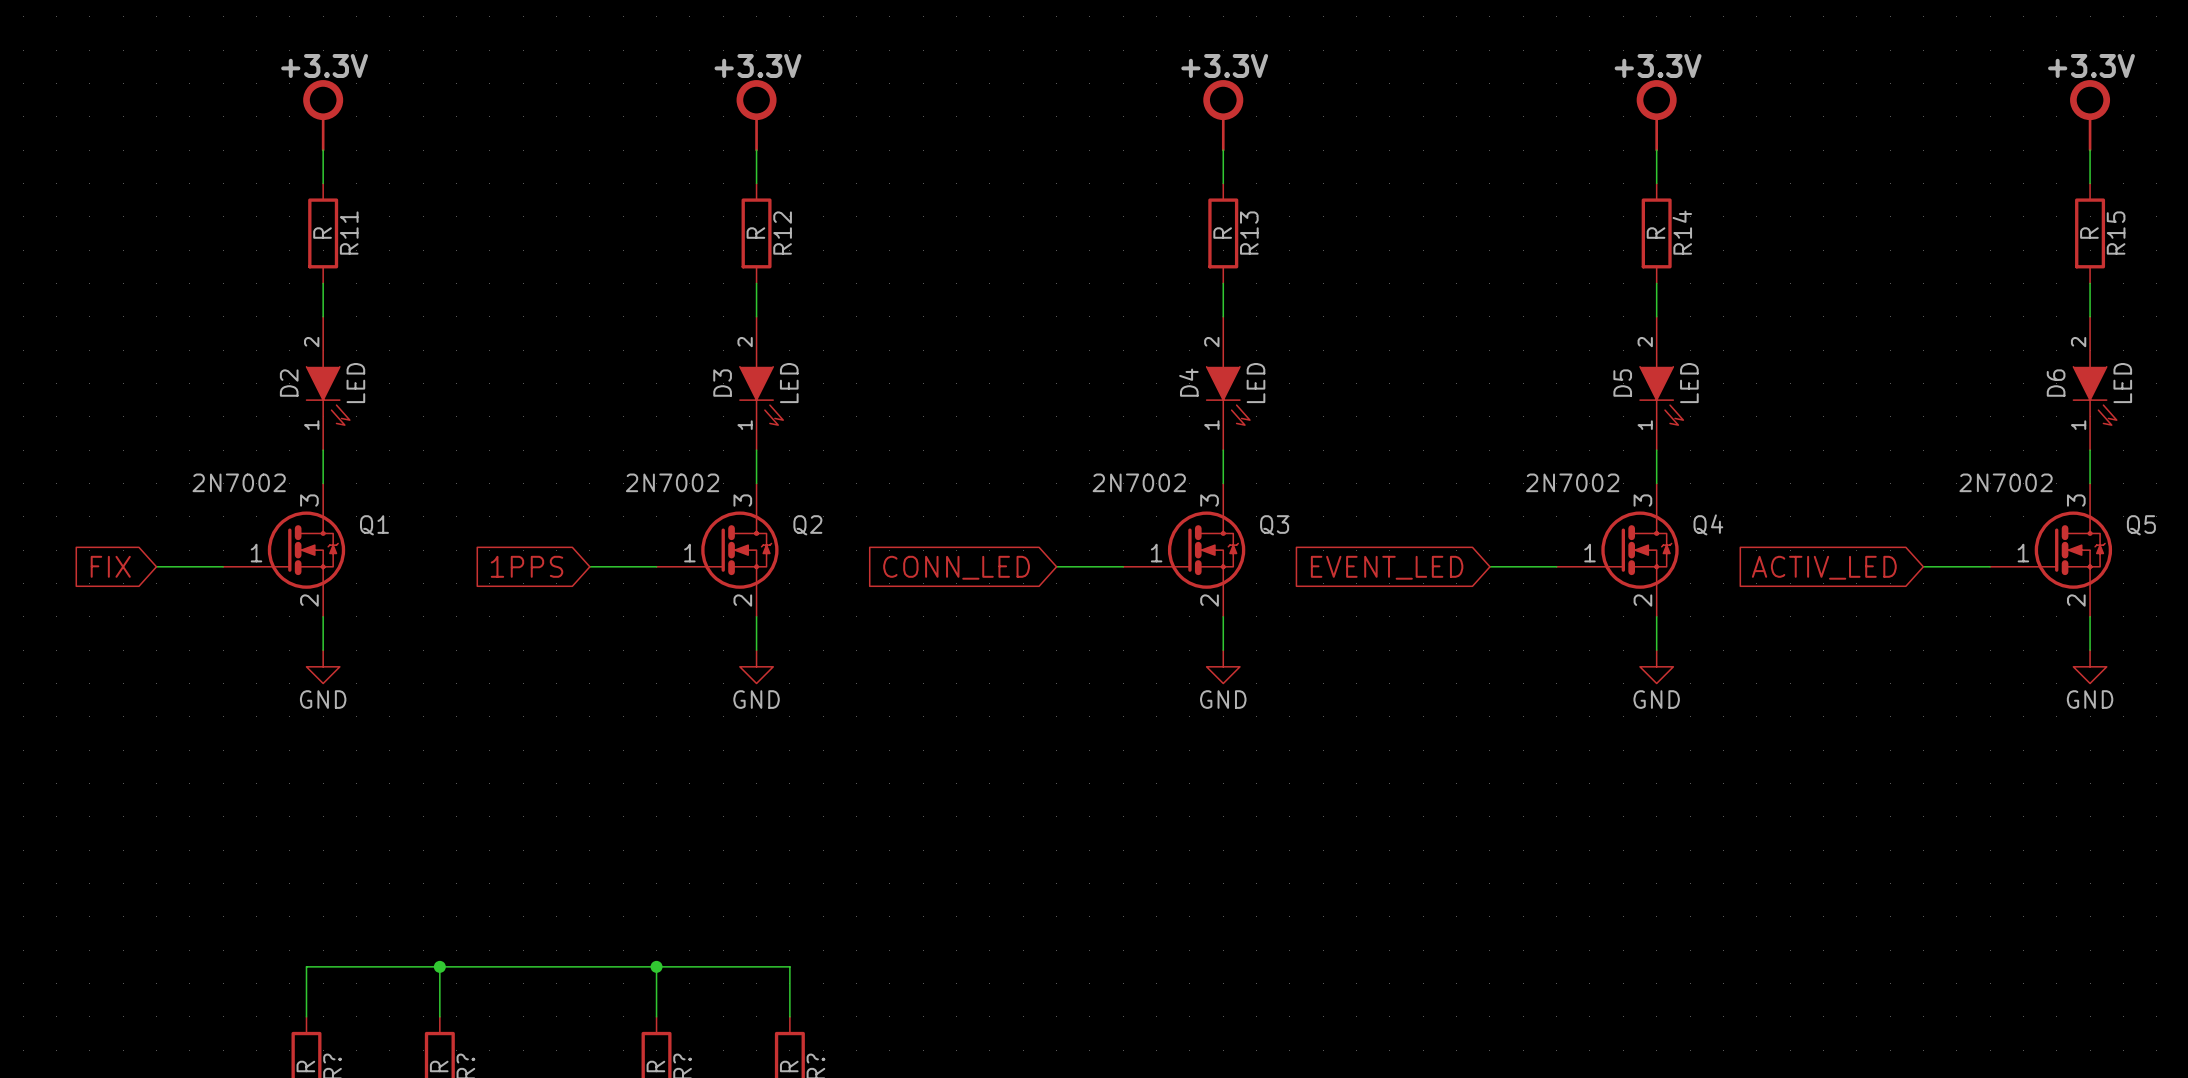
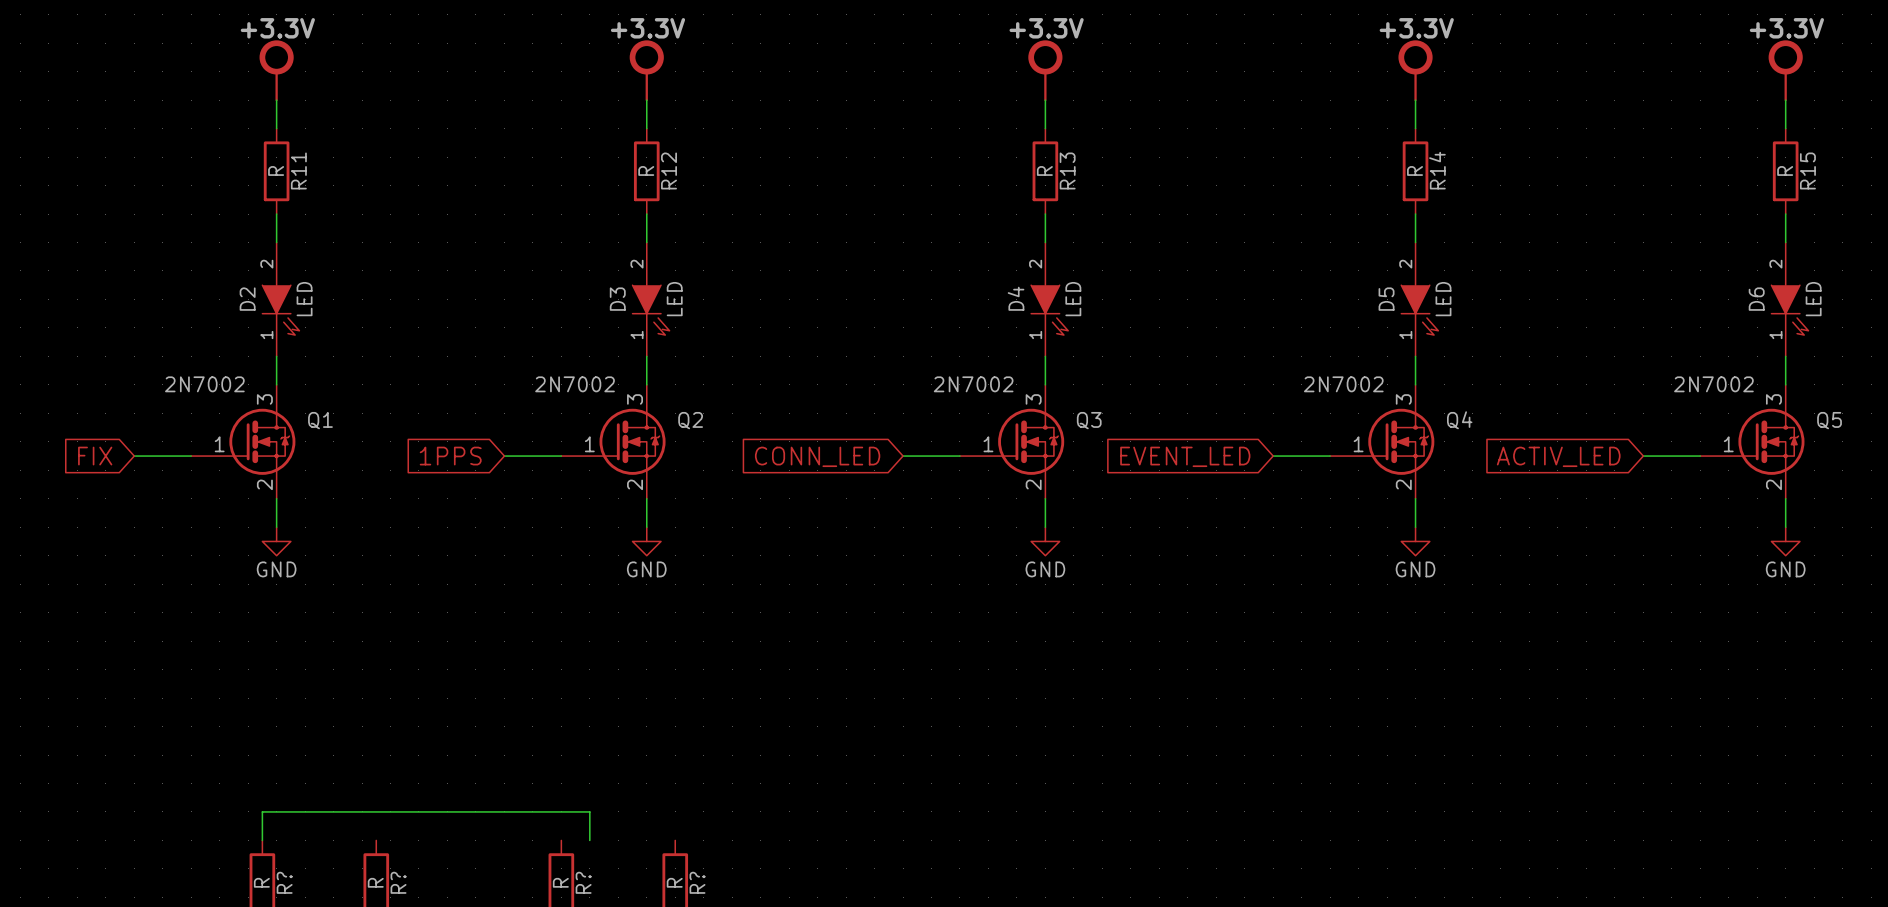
wire: (439, 966) (439, 1016) -> none
junction: (439, 966) -> none
wire: (656, 966) (656, 1016) -> none
junction: (656, 966) -> none
wire: (306, 983) (306, 966) (789, 966) (789, 1016) -> (262, 811) (589, 811) (589, 840)

